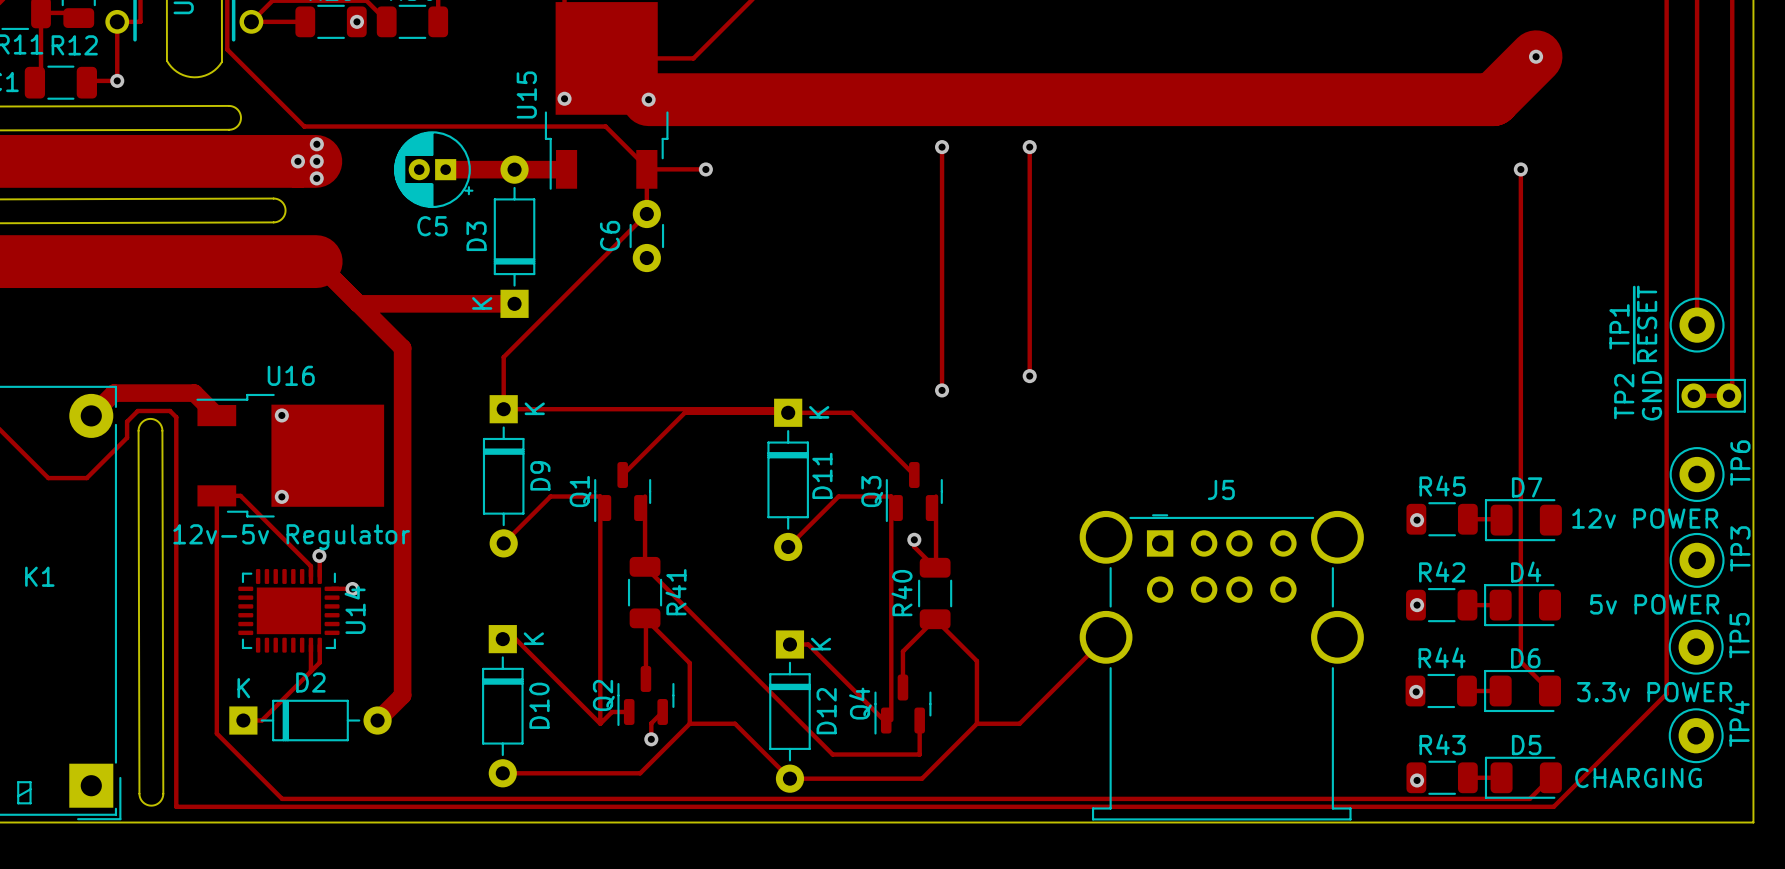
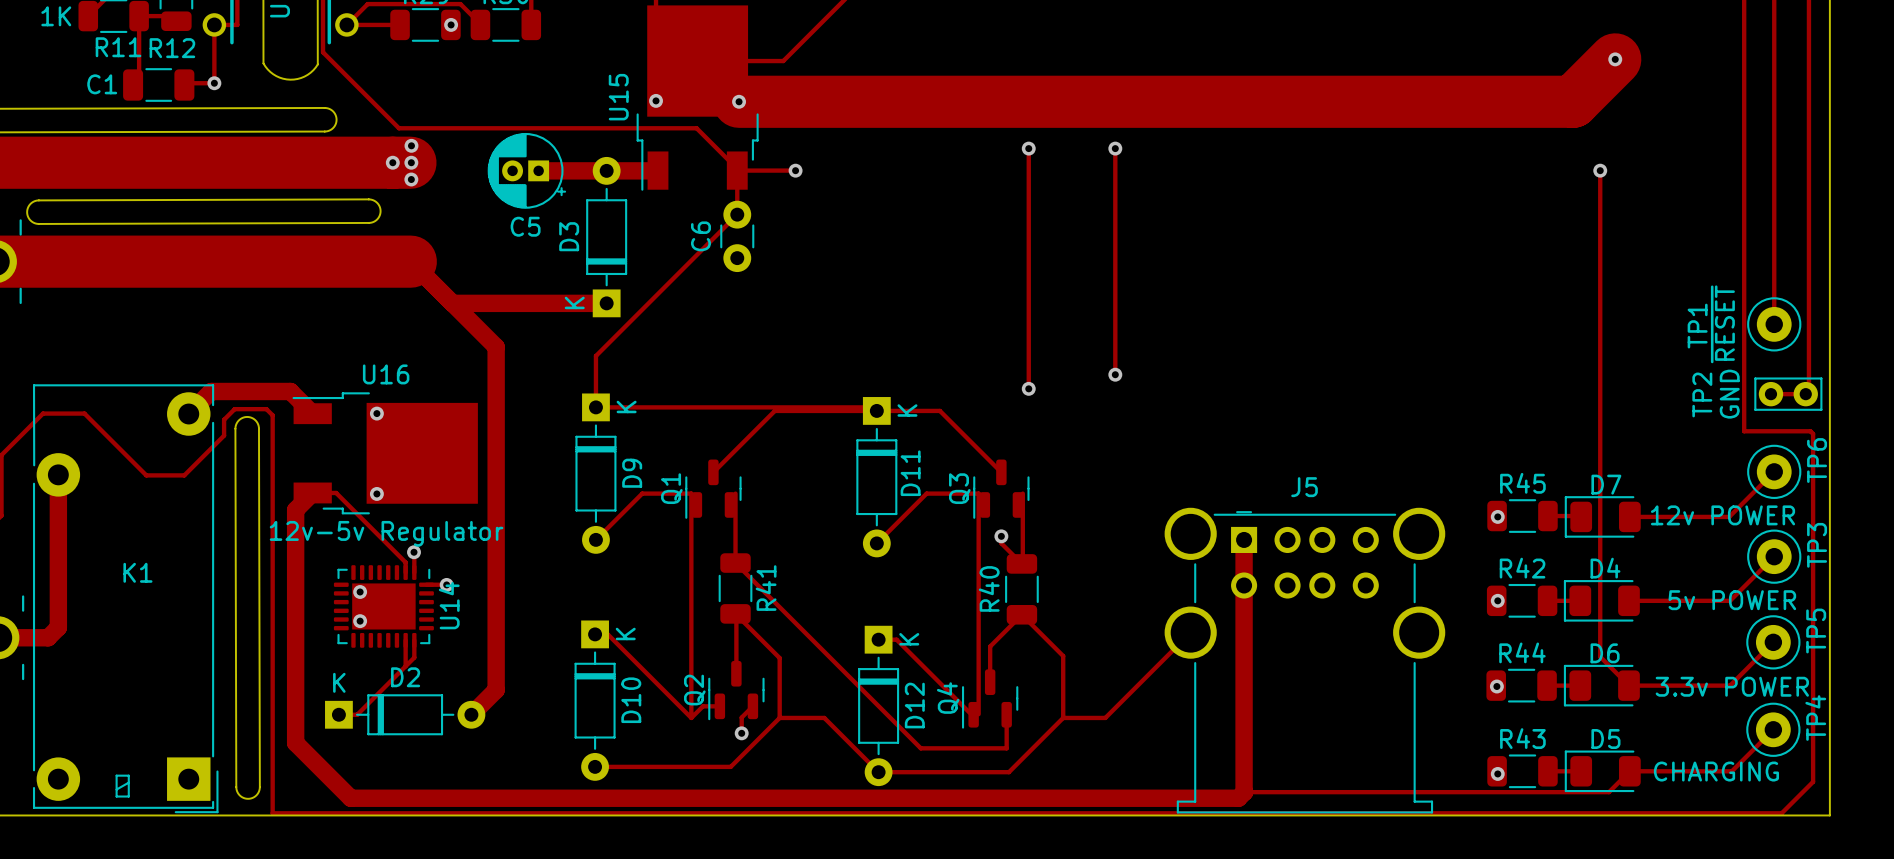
track: (1666, 433) (1666, 693) (1553, 806) (176, 806) -> (1744, 431) (1810, 431) (1813, 433) (1813, 781) (1781, 813) (272, 813) (272, 799)
track: none -> (1774, 471) (1729, 516) (1629, 516)
track: (216, 495) (216, 733) (282, 798) (1160, 798) -> (312, 492) (295, 510) (295, 743) (350, 798) (1238, 798) (1244, 792) (1244, 539)
track: none -> (1774, 556) (1730, 600) (1628, 600)
via: none -> (360, 591)
via: none -> (360, 621)
track: none -> (1773, 642) (1730, 685) (1628, 685)
track: none -> (1773, 729) (1731, 771) (1629, 771)

